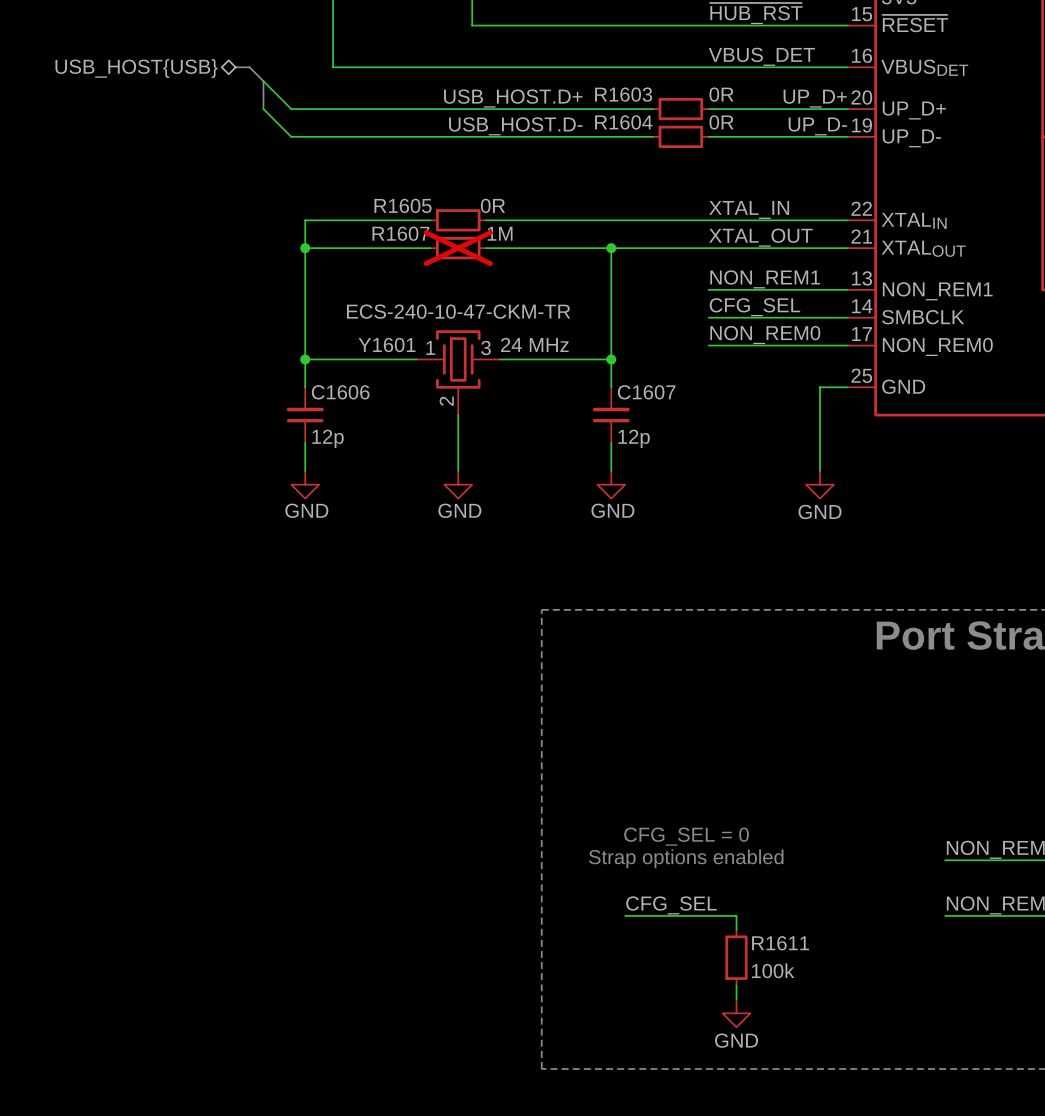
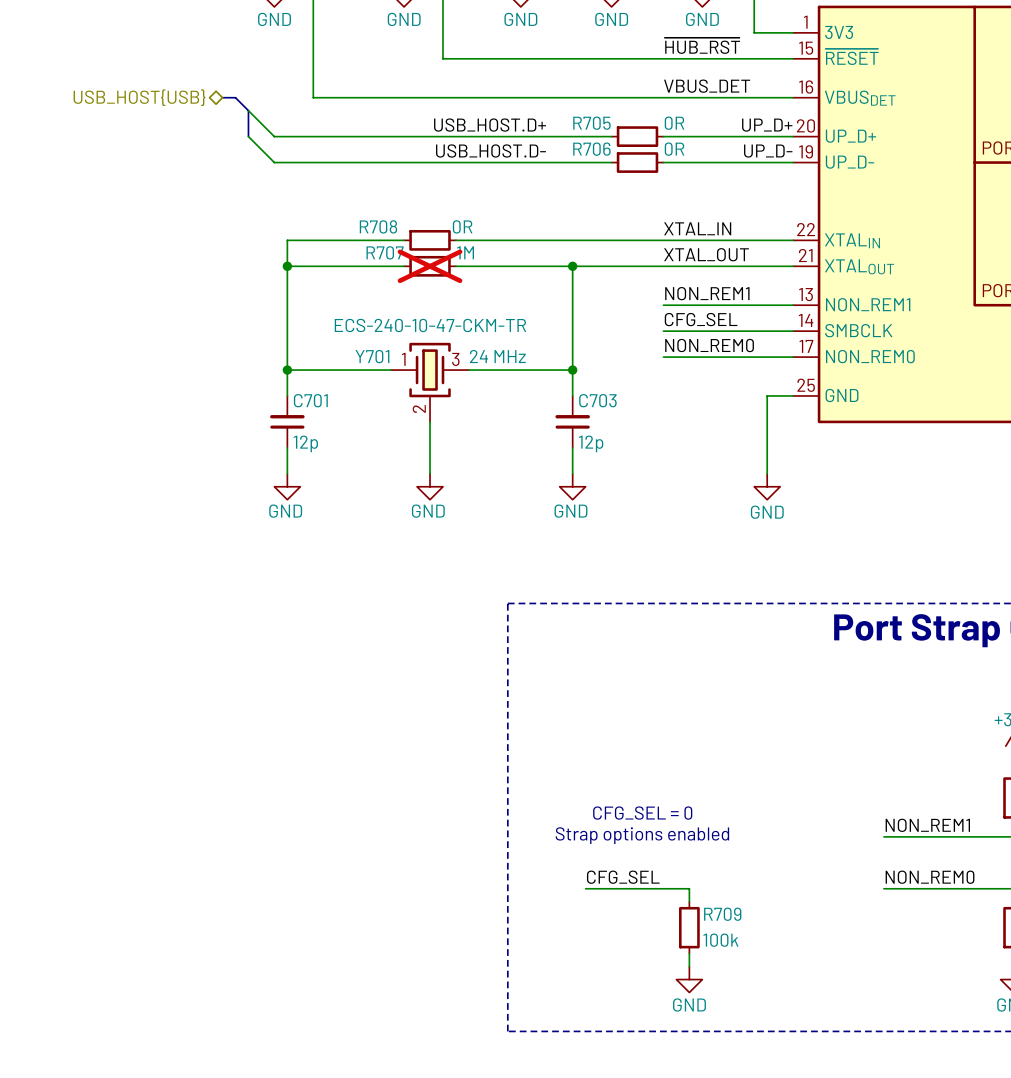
R1603 name: R1603 (623, 94) -> R705 (591, 123)
R1604 name: R1604 (623, 122) -> R706 (591, 149)
R1605 name: R1605 (403, 205) -> R708 (378, 226)
R1607 name: R1607 (400, 233) -> R707 (385, 252)
Y1601 name: Y1601 (387, 345) -> Y701 (372, 356)
C1606 name: C1606 (340, 392) -> C701 (310, 400)
C1607 name: C1607 (646, 392) -> C703 (597, 400)
R1611 name: R1611 (780, 943) -> R709 (722, 914)

